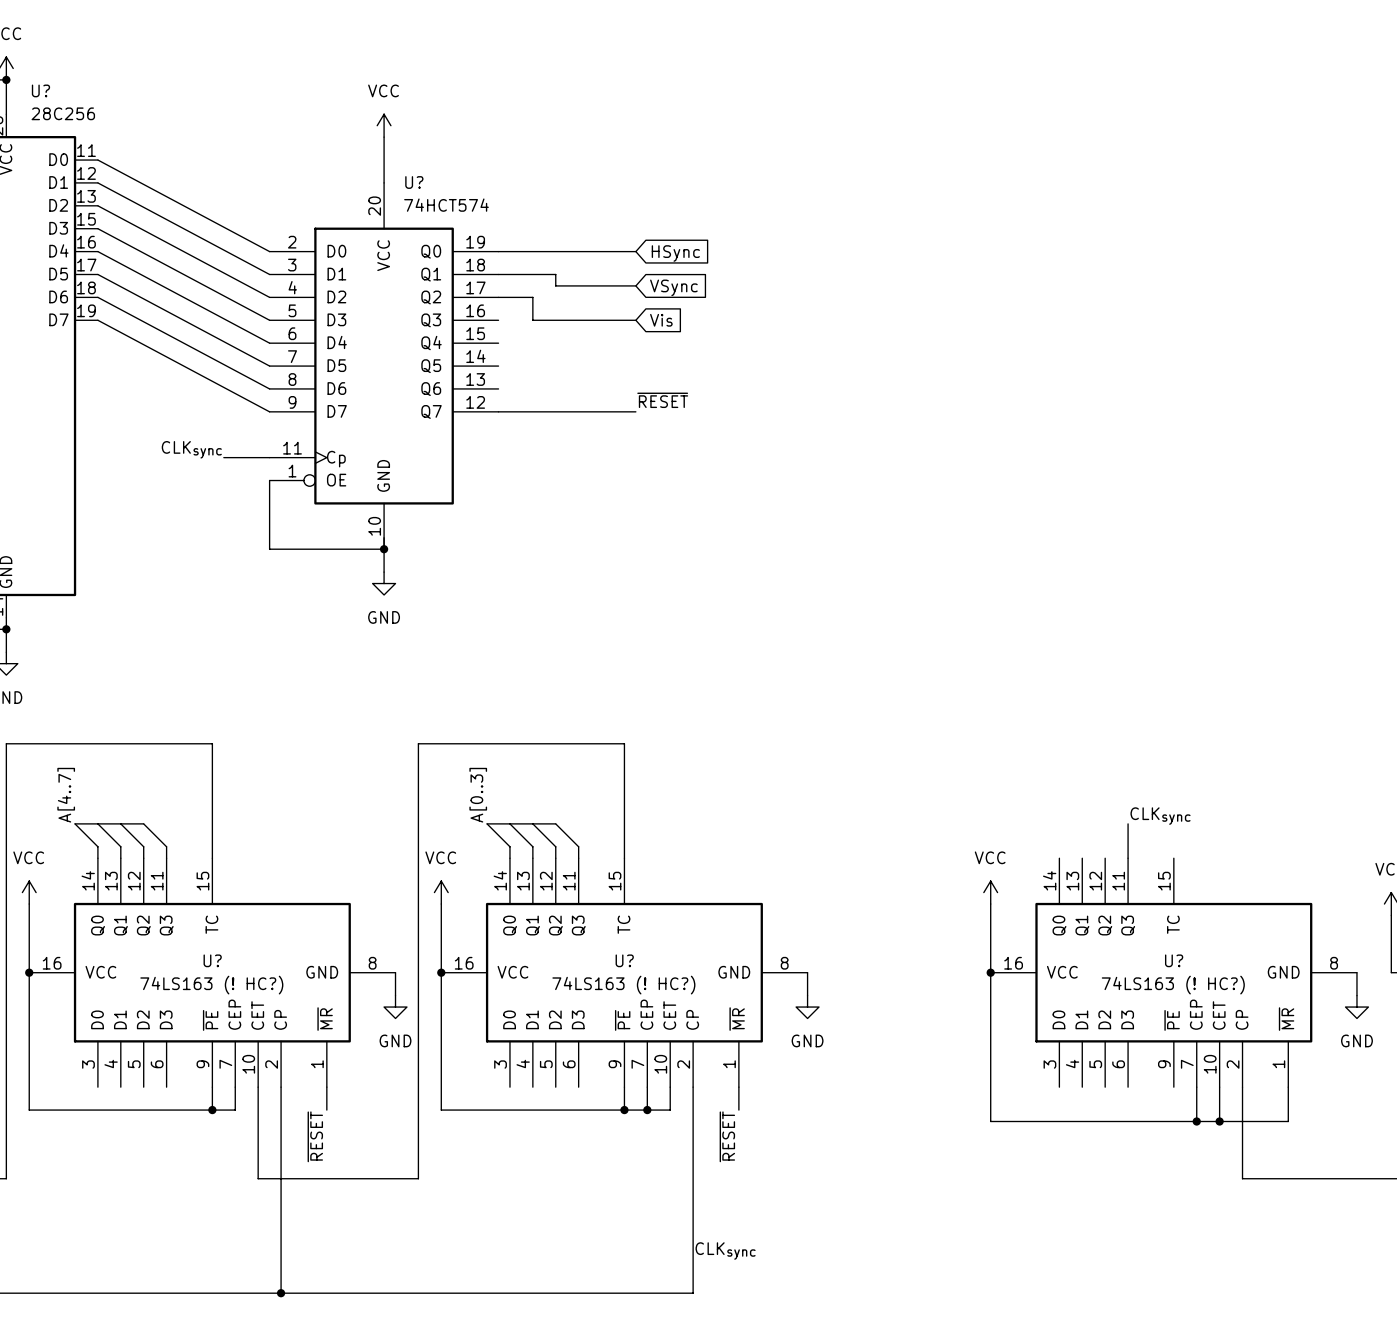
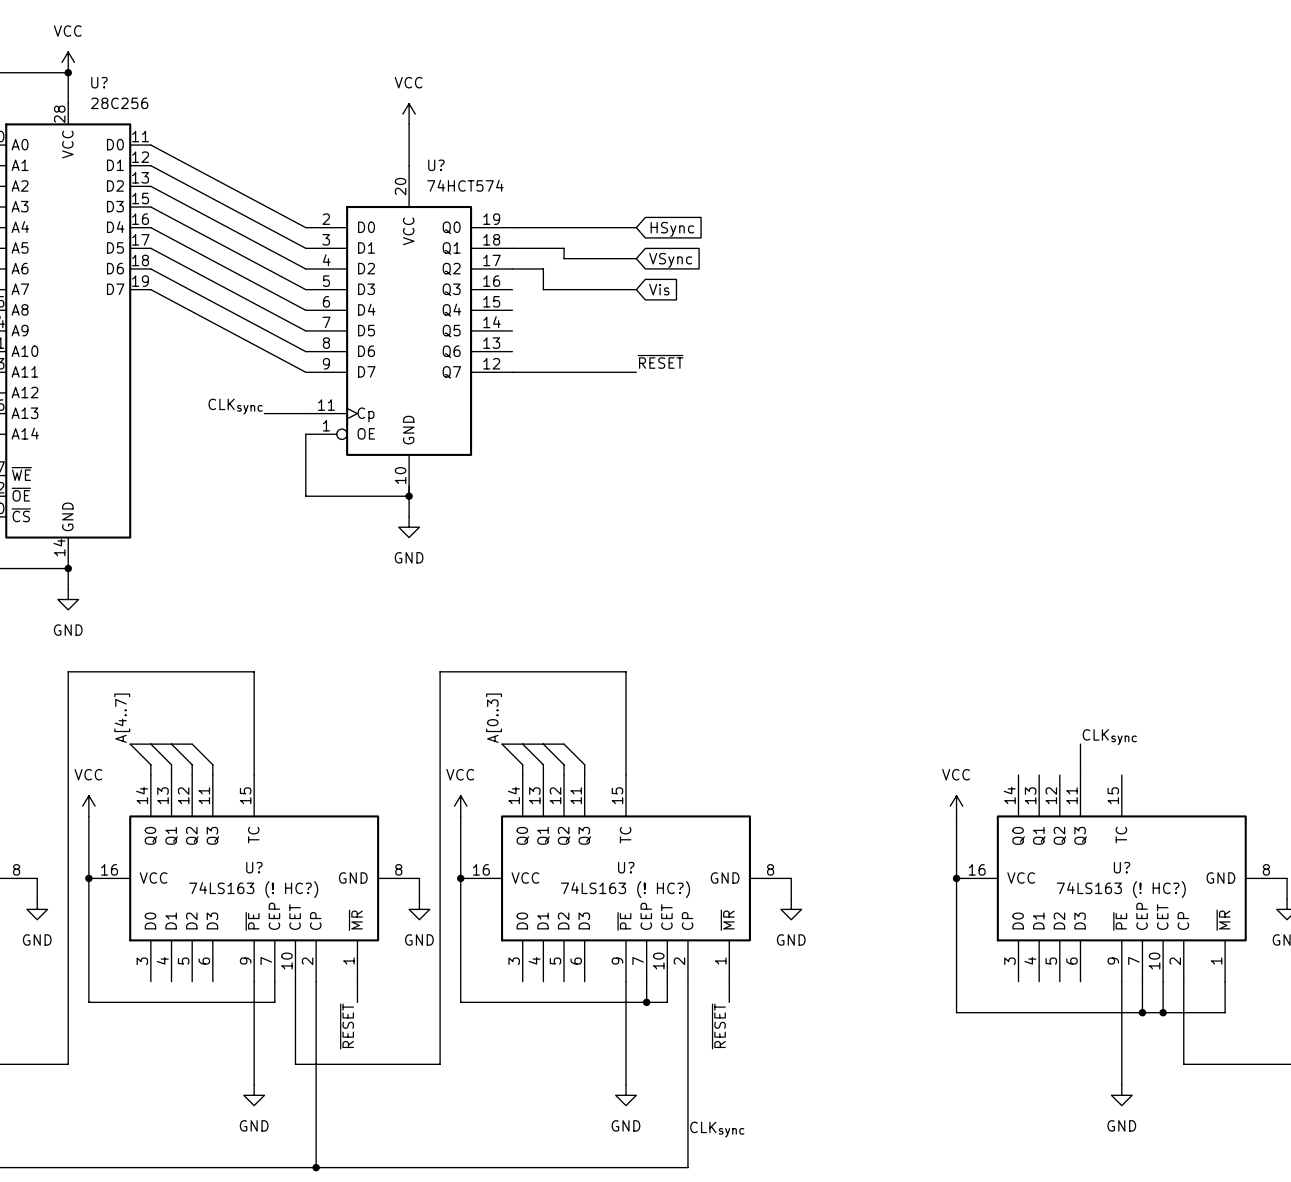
wire: none -> (1121, 981) (1121, 1084)
wire: none -> (254, 1002) (254, 1084)
junction: (212, 1110) -> none
wire: none -> (626, 1002) (626, 1084)
junction: (624, 1110) -> none
power symbol: none -> GND (254, 1095)
power symbol: none -> GND (626, 1095)
power symbol: none -> GND (1121, 1095)

